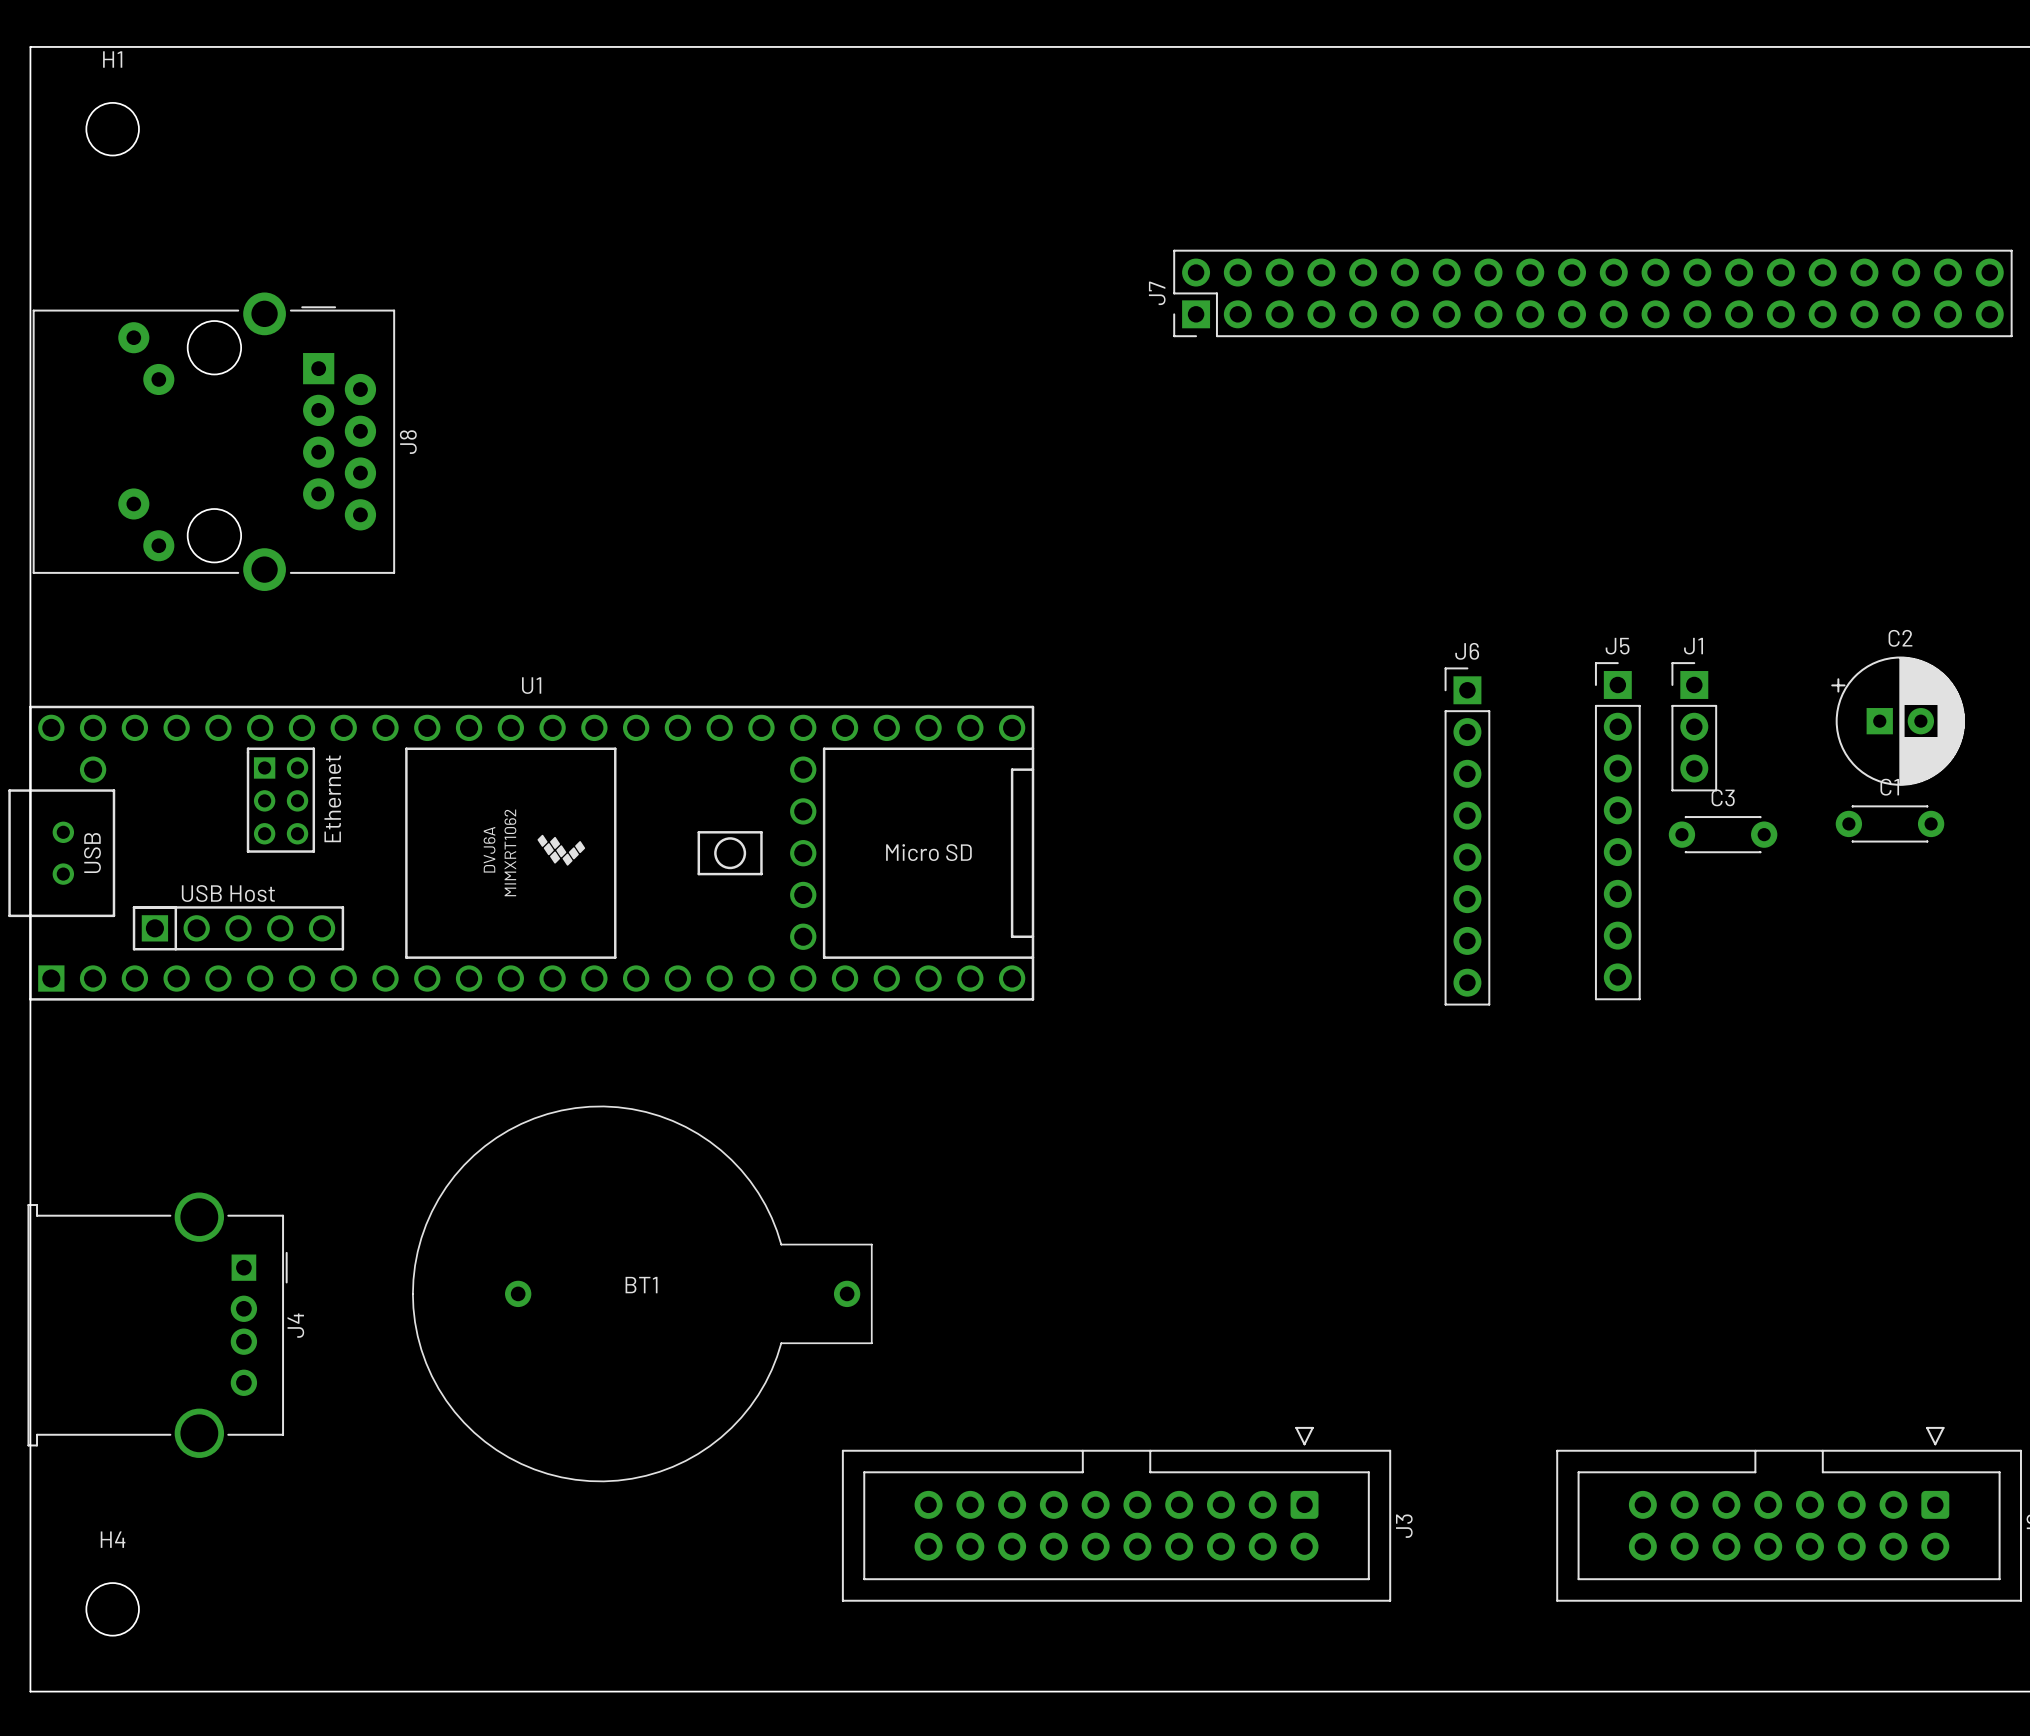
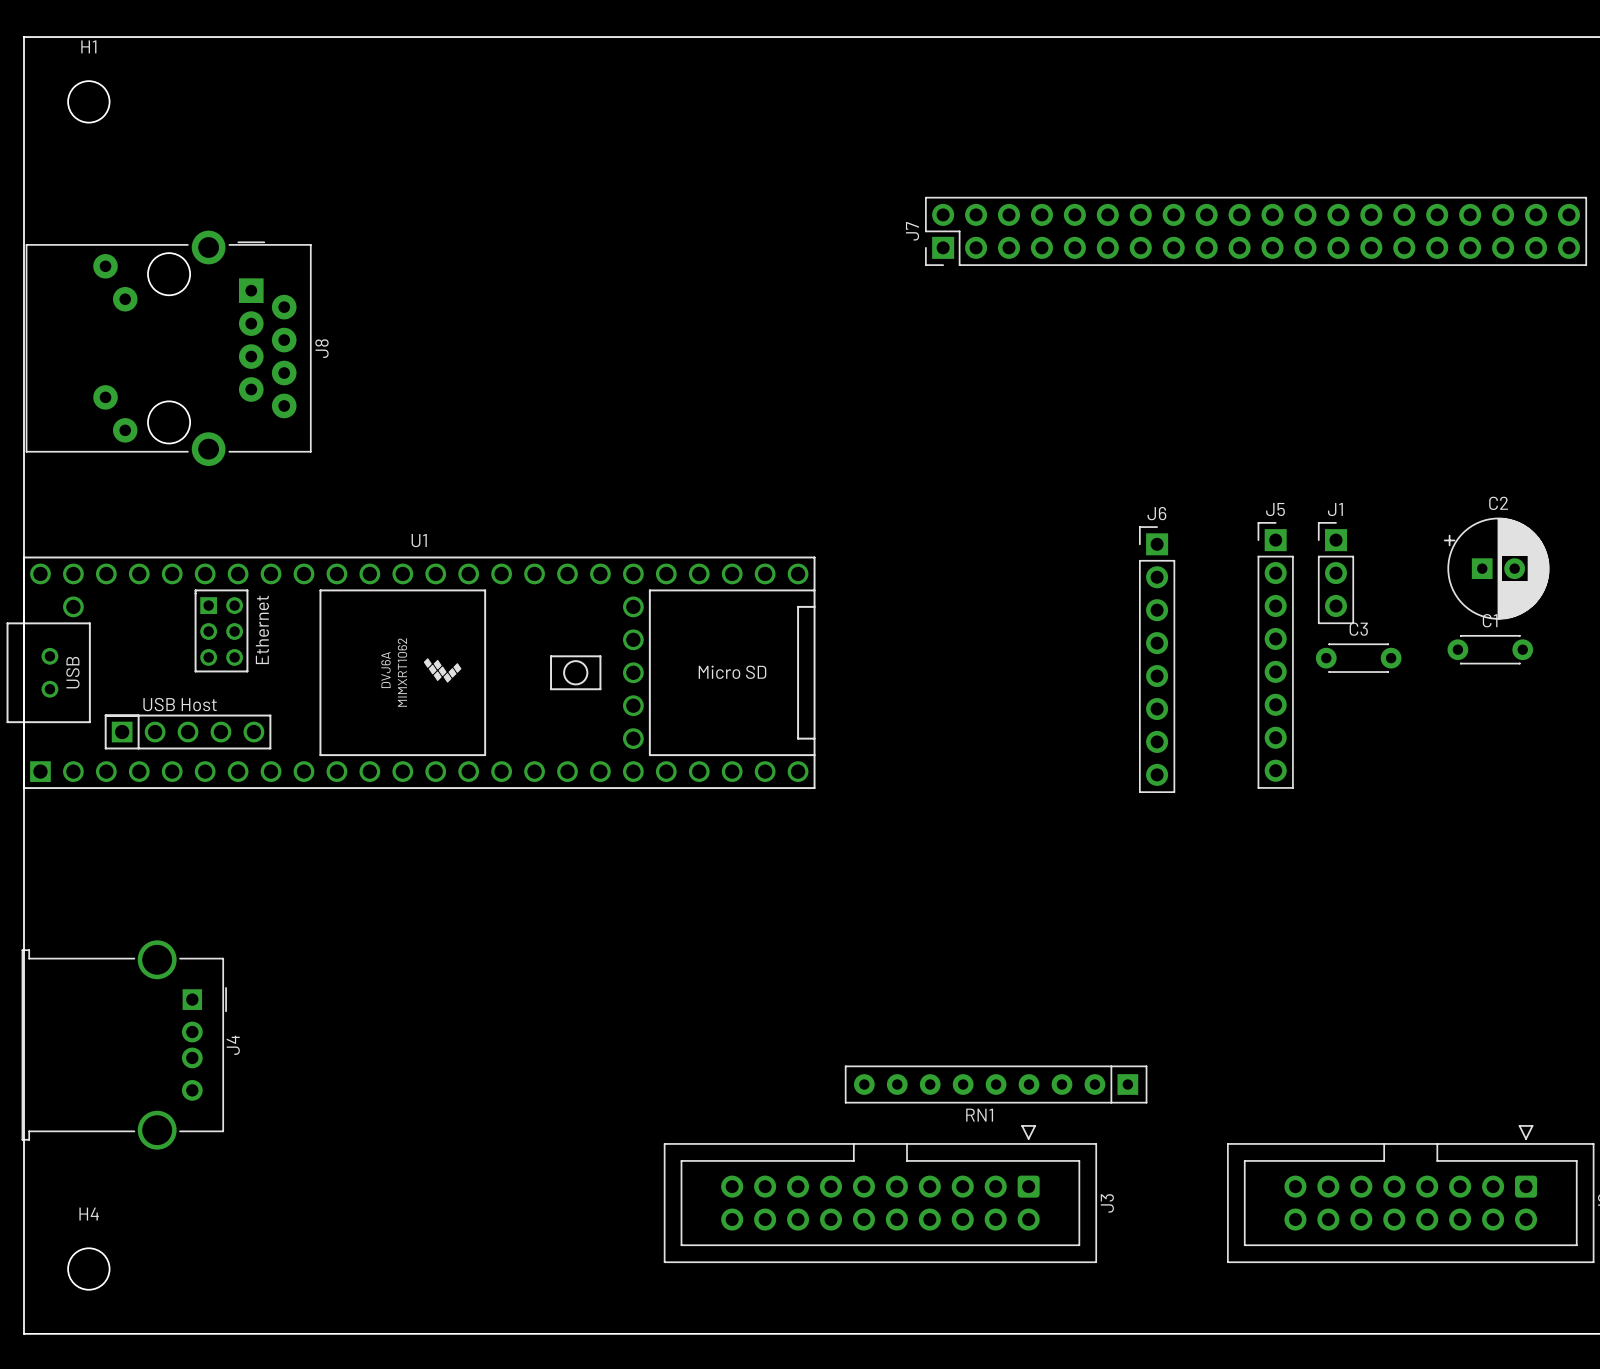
BT1: (642, 1293) -> none
RN1: none -> (996, 1084)

